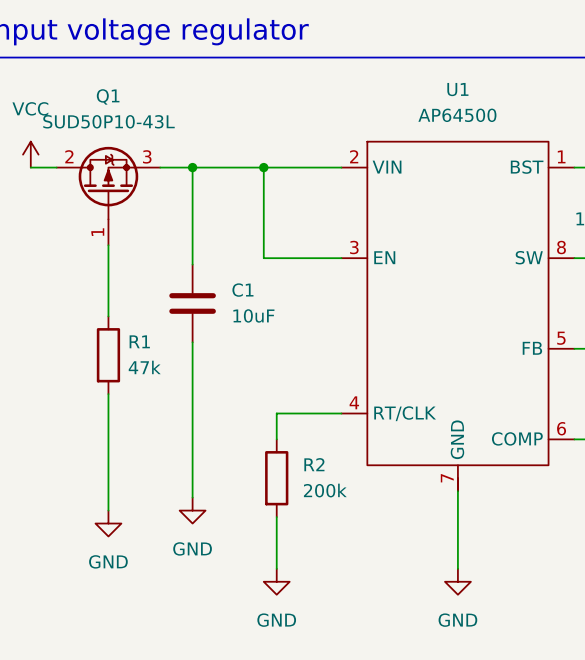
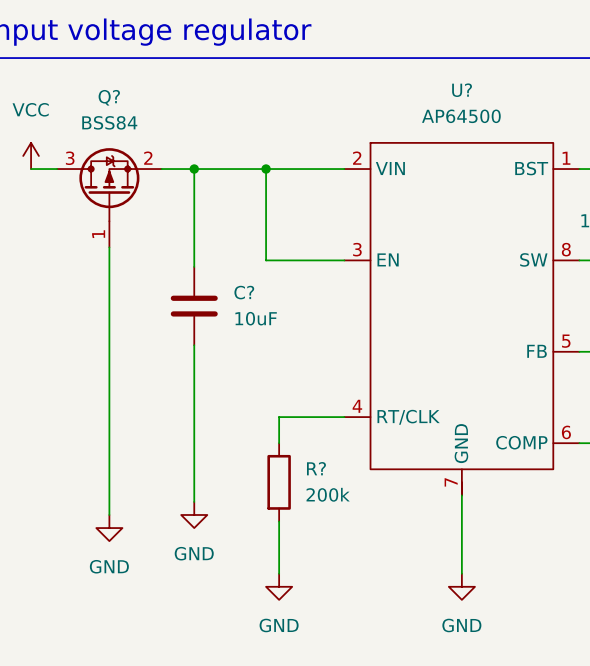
U1 name: U1 (457, 89) -> U? (462, 90)
Q1 name: Q1 (108, 96) -> Q? (109, 97)
Q1 value: SUD50P10-43L (108, 121) -> BSS84 (109, 122)
Q1 pin number: 2 (69, 156) -> 3 (70, 158)
Q1 pin number: 3 (147, 156) -> 2 (148, 158)
C1 name: C1 (242, 290) -> C? (244, 292)
wire: none -> (109, 319) (109, 397)
R1: 47k (108, 355) -> none
R2 name: R2 (314, 464) -> R? (316, 468)

